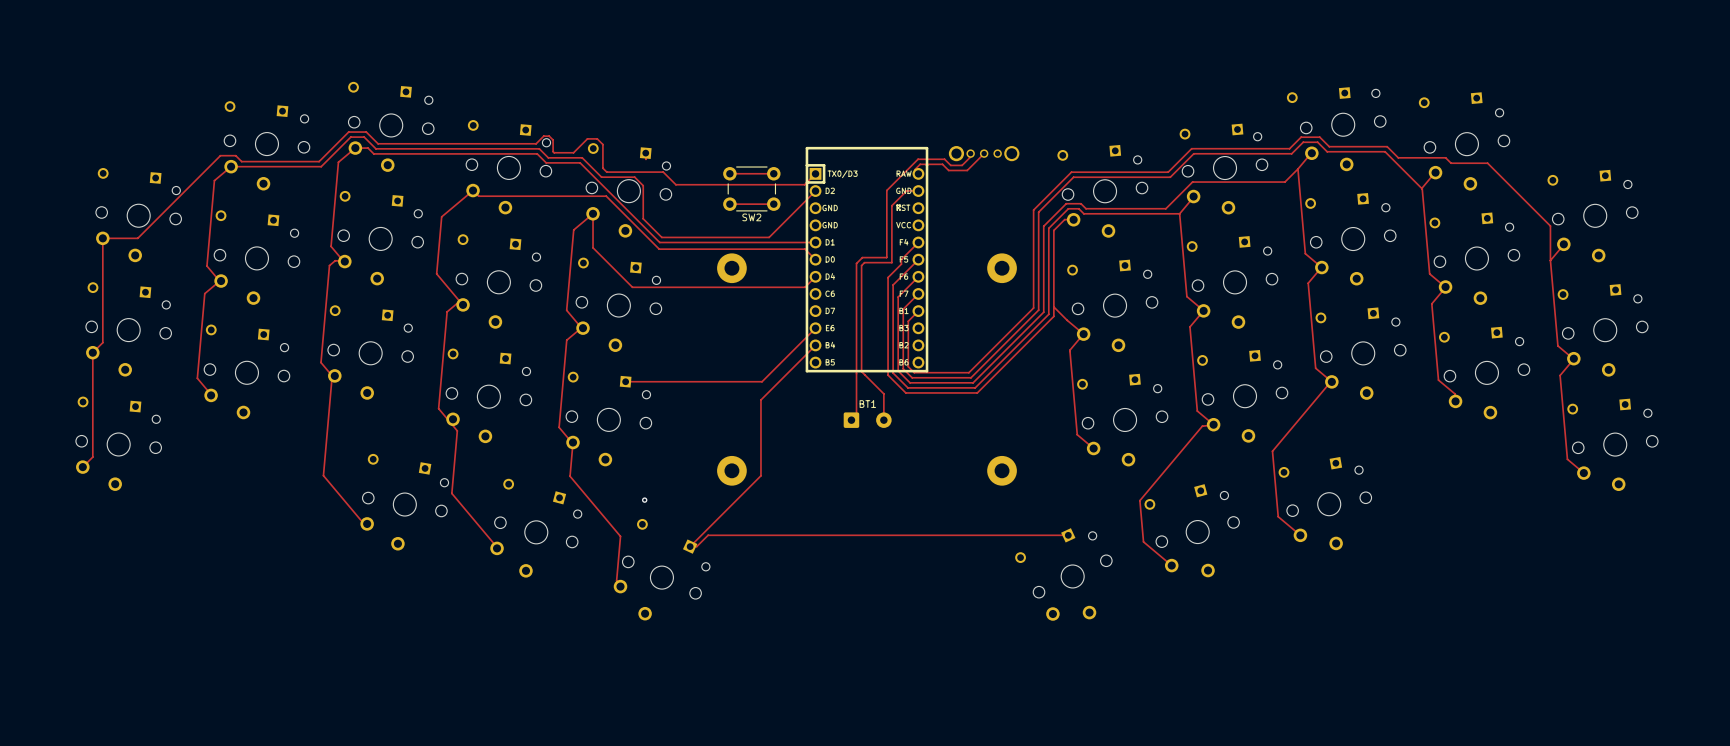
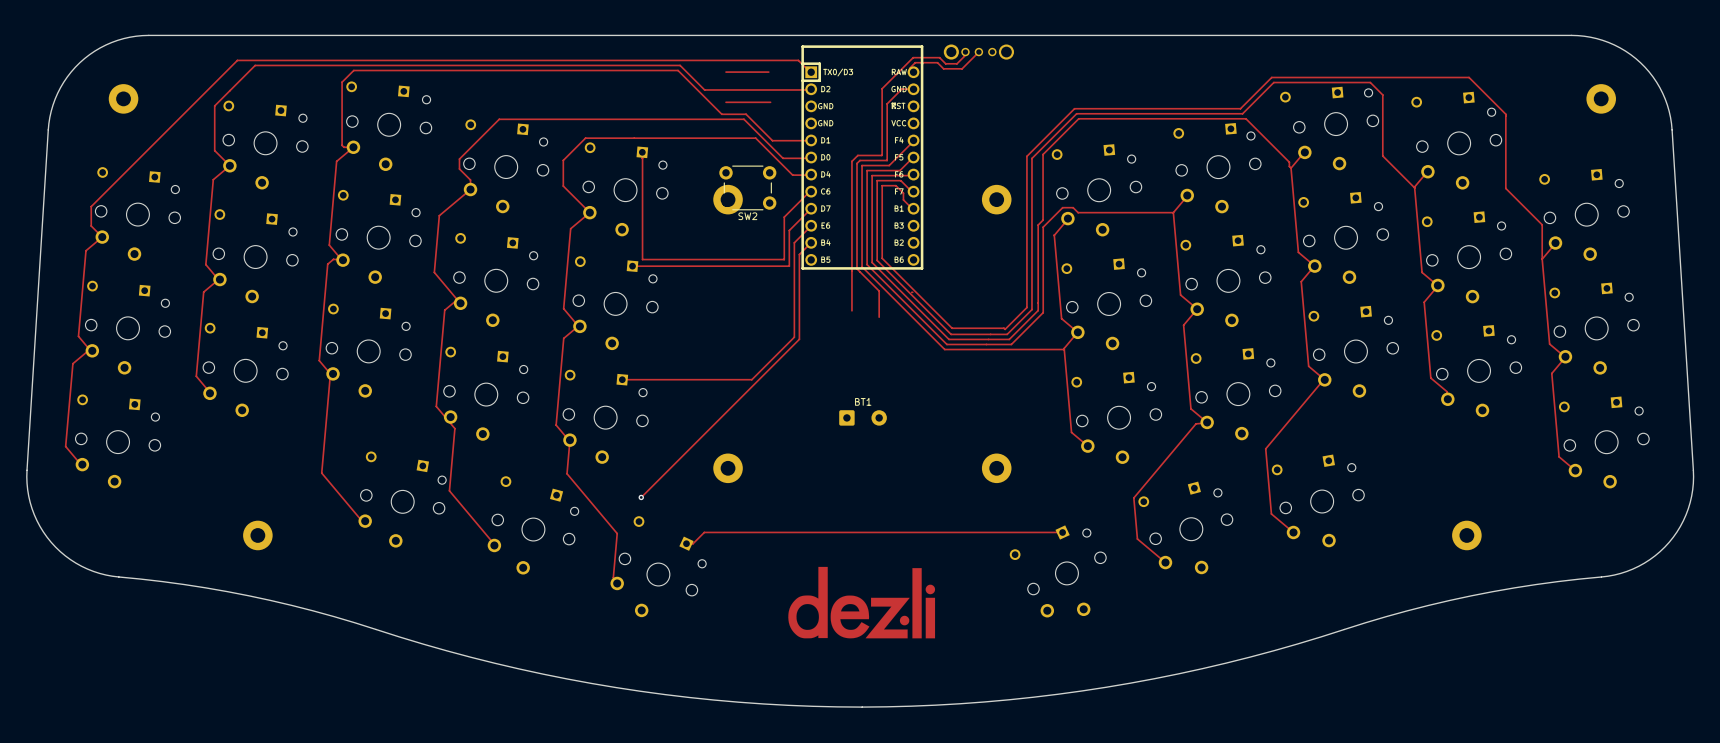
board edge: none -> (148, 35) (1571, 35) (1602, 40) (1625, 51) (1645, 67) (1662, 93) (1670, 117) (1693, 470) (1692, 489) (1688, 508) (1676, 532) (1664, 547) (1644, 563) (1620, 573) (1514, 587) (1449, 600) (1386, 616) (1250, 657) (1154, 678) (1033, 697) (911, 706) (837, 706) (763, 703) (689, 697) (616, 687) (543, 674) (470, 657) (334, 616) (270, 600) (205, 587) (99, 573) (70, 559) (51, 542) (36, 520) (27, 489) (27, 470) (48, 129) (51, 111) (57, 93) (67, 76) (79, 62) (94, 51) (111, 42) (129, 37) (148, 35)
track: none -> (808, 70) (798, 60) (237, 60) (91, 206) (91, 226) (102, 237) (85, 250) (78, 336) (89, 349) (72, 363) (65, 446) (79, 463)
part: none -> (123, 98)
part: none -> (1601, 98)
track: (588, 138) (573, 152) (554, 152) (553, 140) (549, 136) (543, 136) (536, 143) (378, 143) (366, 132) (348, 132) (319, 161) (241, 161) (235, 155) (220, 155) (137, 238) (102, 238) (102, 342) (92, 352) (92, 457) (82, 467) -> none
track: (597, 138) (602, 144) (602, 168) (606, 172) (663, 172) (675, 184) (804, 184) (815, 173) -> (594, 138) (755, 138) (792, 175) (809, 175)
track: none -> (913, 140) (889, 165) (862, 165) (862, 266) (944, 349) (1064, 349)
track: (355, 148) (368, 148) (373, 153) (537, 153) (546, 162) (580, 162) (659, 242) (815, 242) -> (353, 147) (343, 147) (342, 145) (342, 82) (353, 70) (678, 70) (721, 114) (746, 114) (772, 140) (810, 140)
track: (984, 153) (967, 170) (948, 170) (942, 164) (920, 164) (914, 169) -> (978, 52) (962, 68) (943, 68) (937, 62) (915, 62) (909, 68)
part position: (984, 153) -> (978, 52)
track: (969, 154) (969, 157) (962, 165) (950, 165) (944, 159) (918, 159) (886, 190) (886, 257) (862, 257) (856, 263) -> (964, 52) (964, 56) (957, 63) (945, 63) (939, 57) (913, 57) (882, 88) (882, 155) (857, 155) (851, 161) (851, 262)
track: (1390, 156) (1385, 151) (1327, 151) (1317, 142) (1303, 142) (1291, 153) (1193, 153) (1170, 177) (1073, 177) (1038, 212) (1037, 311) -> (1382, 156) (1382, 94) (1370, 82) (1273, 82) (1242, 113) (1076, 113) (1031, 158) (1031, 309)
track: none -> (642, 158) (642, 259) (784, 259) (784, 217) (808, 192) (810, 192)
track: (231, 166) (321, 166) (350, 137) (364, 137) (375, 148) (539, 148) (548, 157) (582, 157) (601, 177) (634, 177) (643, 185) (643, 218) (661, 237) (769, 237) (815, 191) (813, 191) -> (229, 165) (214, 150) (214, 105) (255, 65) (680, 65) (704, 89) (810, 89)
track: (1297, 169) (1284, 182) (1192, 182) (1165, 208) (1086, 208) (1081, 203) (1066, 203) (1048, 221) -> (1291, 168) (1289, 162) (1245, 118) (1078, 118) (1043, 154) (1043, 220)
track: (729, 173) (772, 173) -> (726, 72) (768, 72)
track: (1513, 189) (1487, 163) (1451, 163) (1445, 157) (1398, 157) (1387, 146) (1329, 146) (1319, 137) (1301, 137) (1289, 148) (1191, 148) (1168, 172) (1071, 172) (1033, 210) (1032, 309) -> (1505, 188) (1505, 114) (1469, 77) (1271, 77) (1240, 108) (1074, 108) (1026, 156) (1026, 307)
track: (473, 190) (478, 196) (606, 196) (659, 249) (805, 249) (815, 259) -> (470, 189) (470, 180) (459, 169) (459, 159) (499, 119) (744, 119) (783, 158) (810, 158)
track: (916, 190) (906, 190) (891, 205) (891, 262) (864, 262) (861, 265) -> (911, 89) (901, 89) (887, 103) (887, 160) (859, 160) (857, 163) (857, 264)
track: (729, 204) (774, 204) -> (726, 102) (770, 102)
track: none -> (809, 210) (789, 230) (789, 266)
track: (593, 213) (593, 247) (632, 287) (805, 287) (815, 276) -> (589, 212) (563, 186) (563, 160) (585, 138)
track: (1073, 219) (1064, 219) (1053, 230) (1053, 316) (977, 392) (905, 392) (888, 375) (888, 277) (901, 264) (901, 259) (918, 242) -> none
track: none -> (1067, 219) (1054, 235)
track: none -> (810, 243) (799, 254) (799, 339) (641, 497)
part position: (866, 259) -> (862, 157)
track: (918, 259) (893, 284) (893, 373) (907, 387) (975, 387) (1016, 346) -> (913, 157) (899, 170) (867, 170) (867, 264) (946, 344) (1011, 344)
track: none -> (632, 266) (789, 266)
part position: (731, 268) -> (728, 199)
part position: (1002, 268) -> (996, 199)
track: (861, 270) (861, 371) (883, 393) -> (857, 268) (879, 291)
track: (918, 276) (898, 297) (898, 370) (910, 382) (973, 382) (1014, 341) -> (911, 173) (908, 175) (872, 175) (872, 262) (949, 339) (1009, 339)
track: (918, 293) (903, 309) (903, 368) (912, 377) (971, 377) (1012, 336) -> (912, 191) (900, 180) (877, 180) (877, 260) (951, 334) (1007, 334)
track: (1053, 306) (1067, 320) -> (1054, 235) (1061, 318)
track: (918, 311) (908, 321) (908, 366) (914, 372) (968, 372) (1010, 331) -> (912, 209) (903, 199) (903, 193) (895, 185) (882, 185) (882, 258) (952, 328) (1005, 329)
track: (856, 312) (856, 413) -> none
track: (815, 328) (762, 381) (755, 381) -> (811, 225) (794, 242) (794, 337) (751, 379)
track: (815, 345) (760, 399) (760, 475) (690, 546) -> none
track: (883, 394) (883, 420) -> (879, 291) (879, 317)
part: none -> (257, 535)
part: none -> (1466, 535)
drawing: none -> [788, 566, 936, 639]

